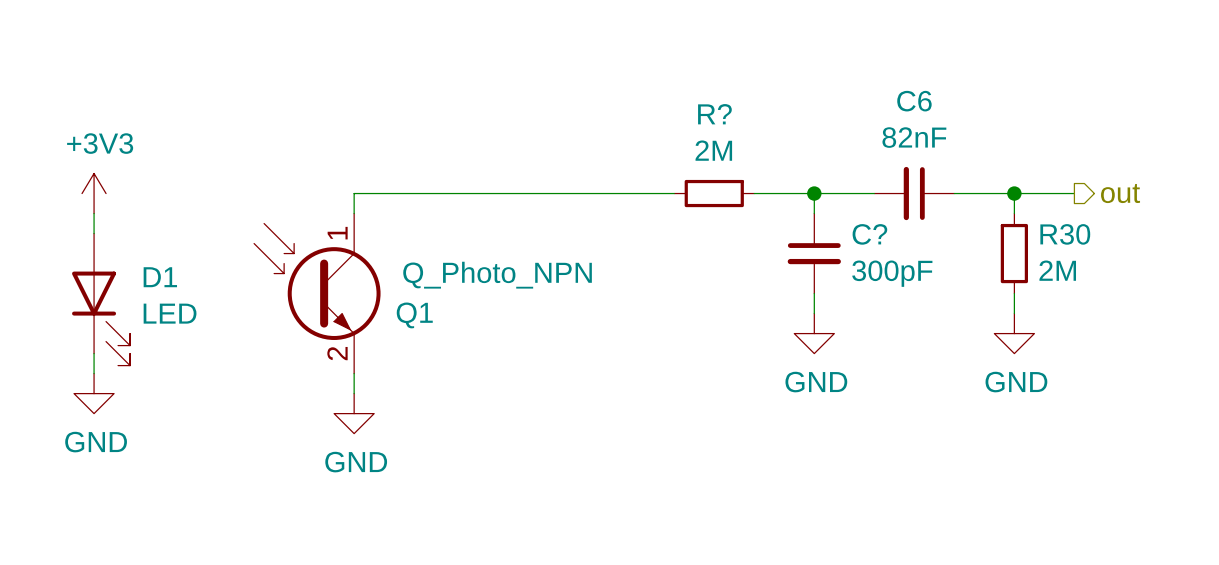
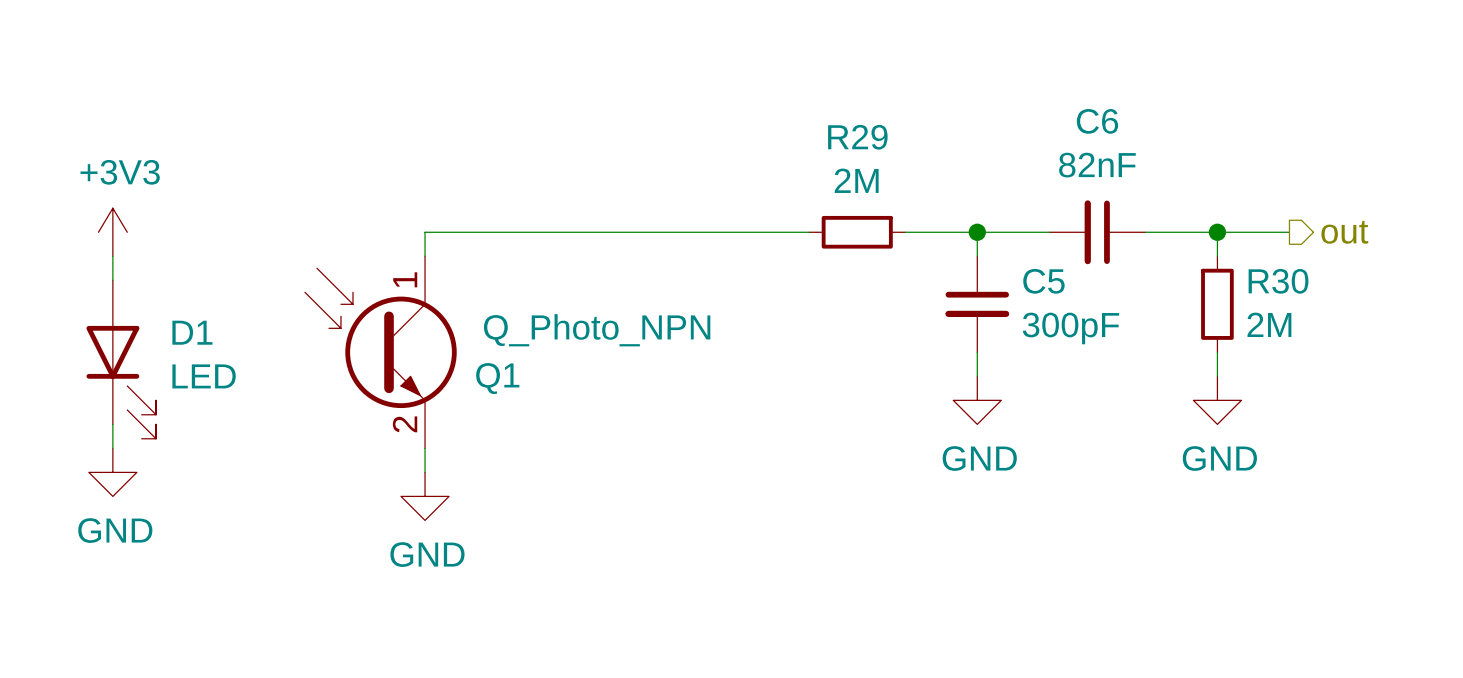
R? name: R? (714, 114) -> R29 (857, 137)
C? name: C? (869, 234) -> C5 (1043, 281)

